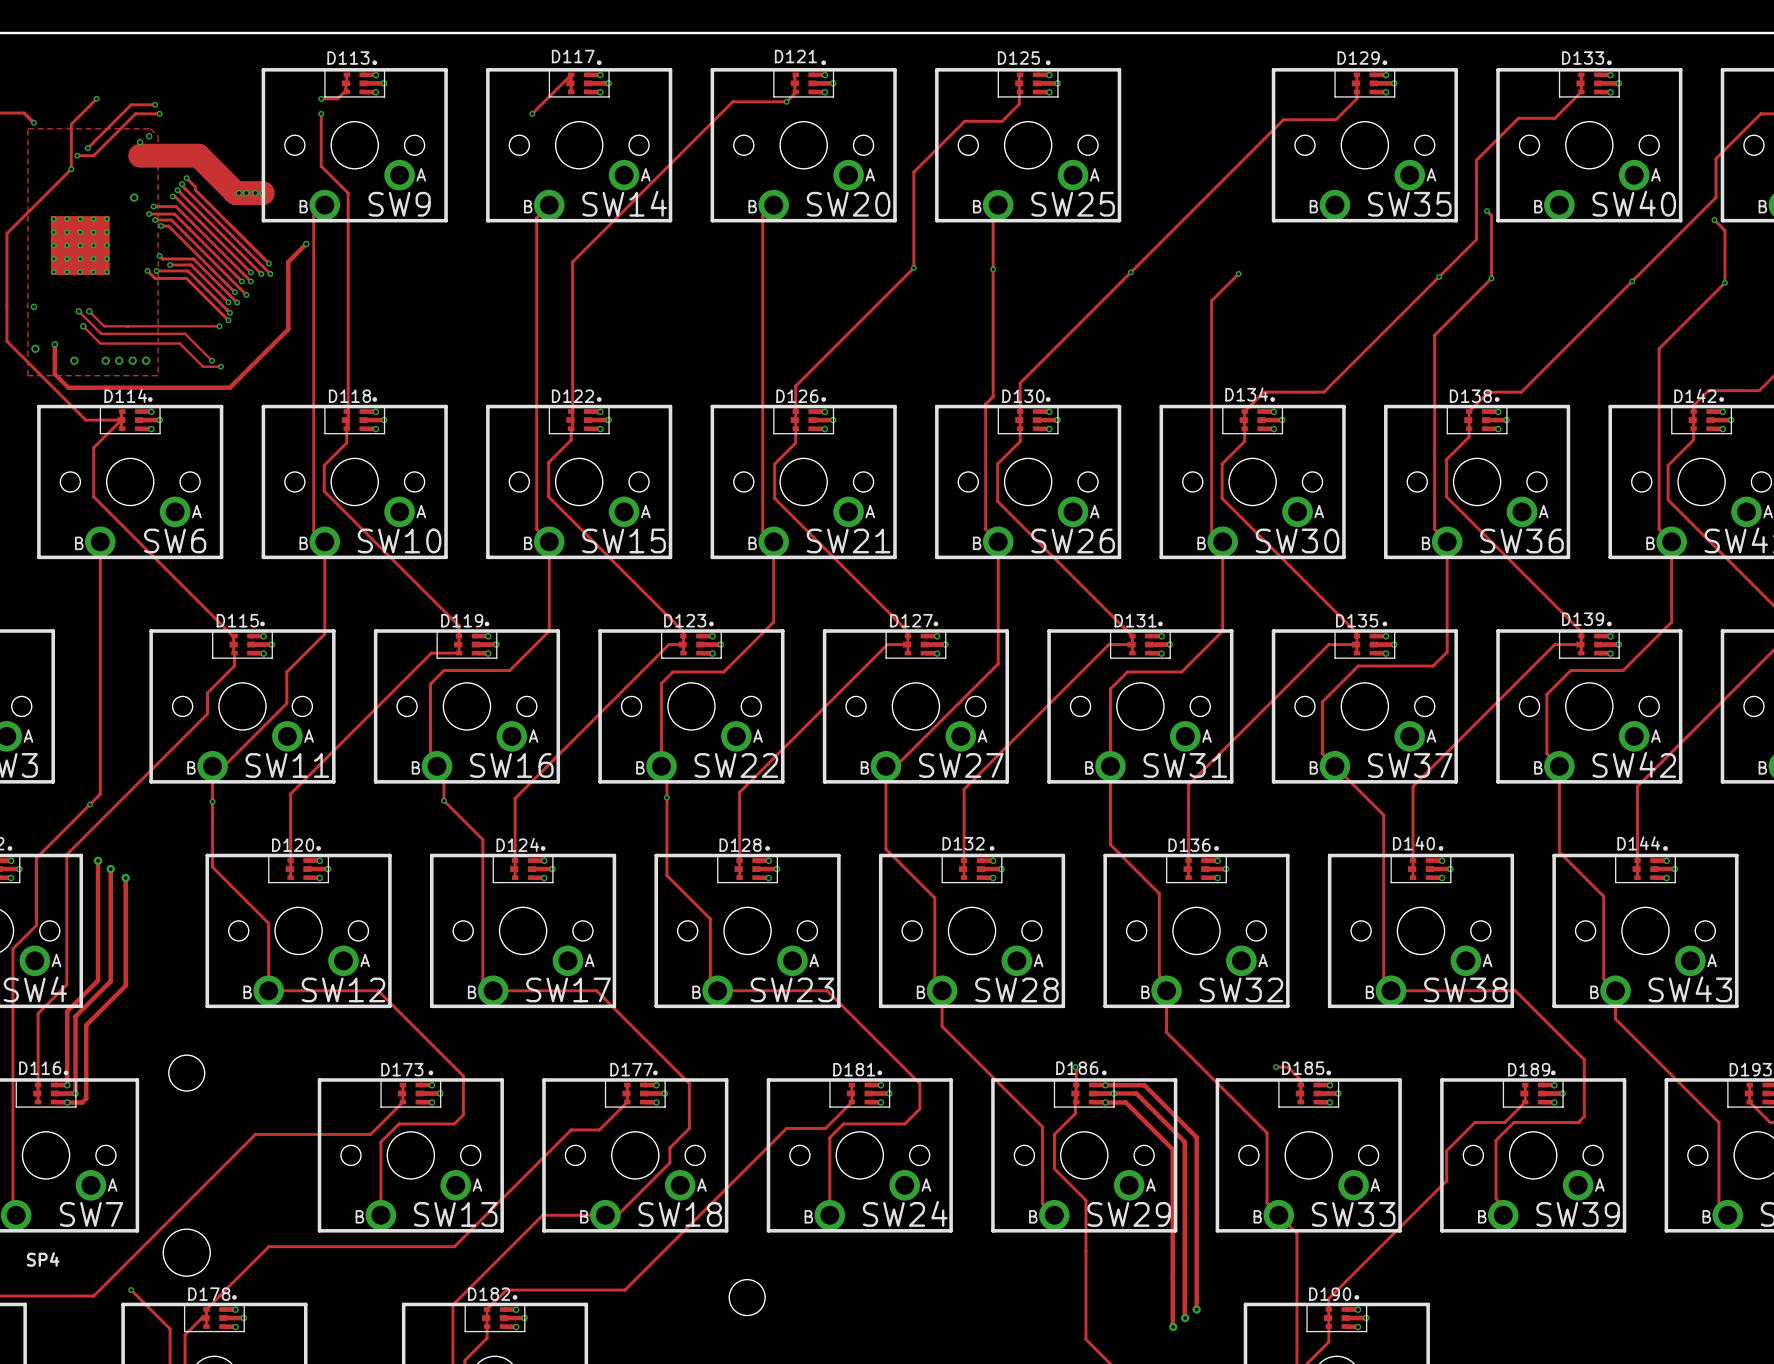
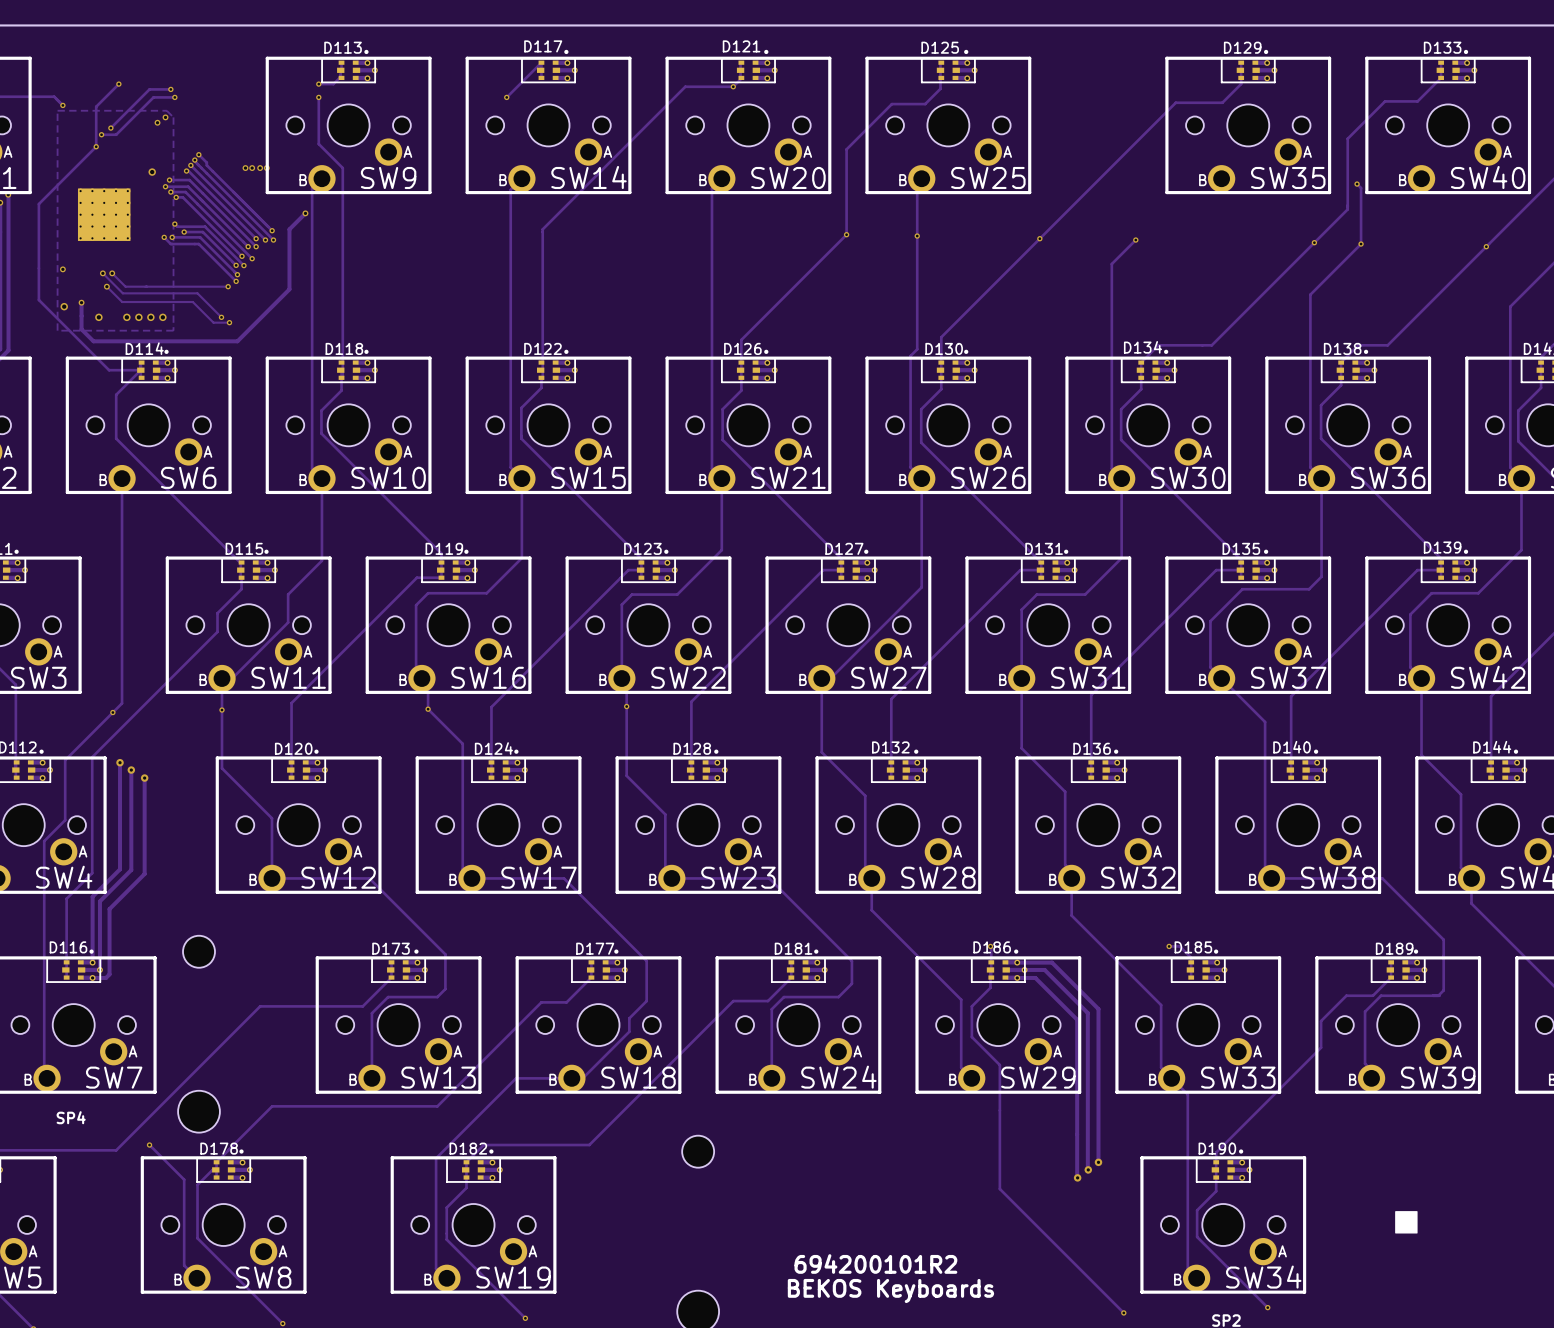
track: (140, 155) (198, 155) (235, 193) (262, 193) -> none

